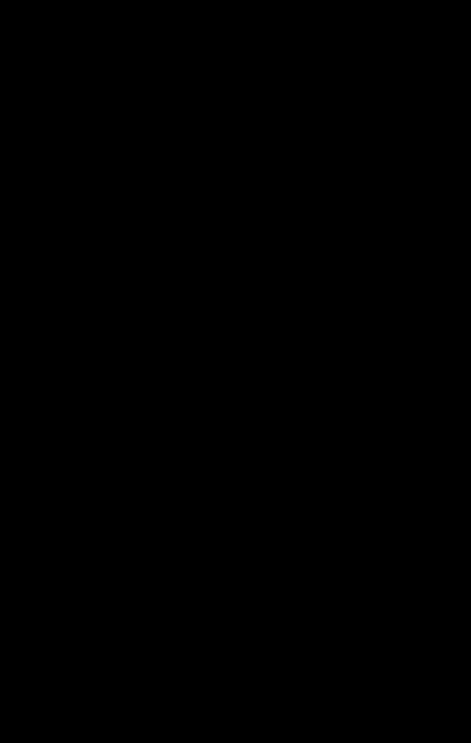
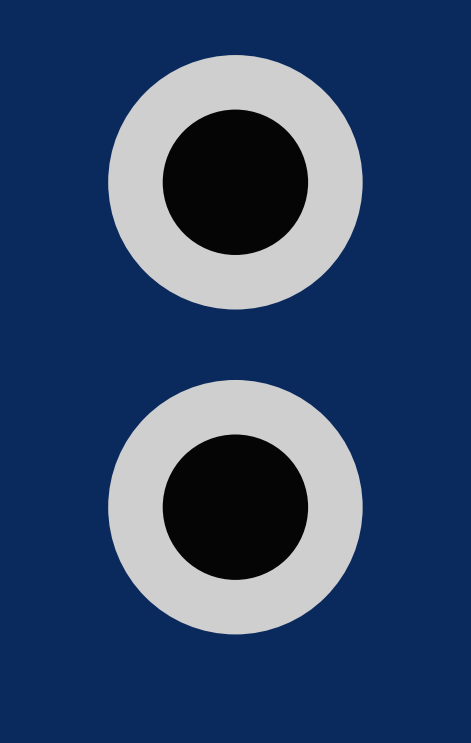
part: none -> (235, 182)
part: none -> (235, 507)

